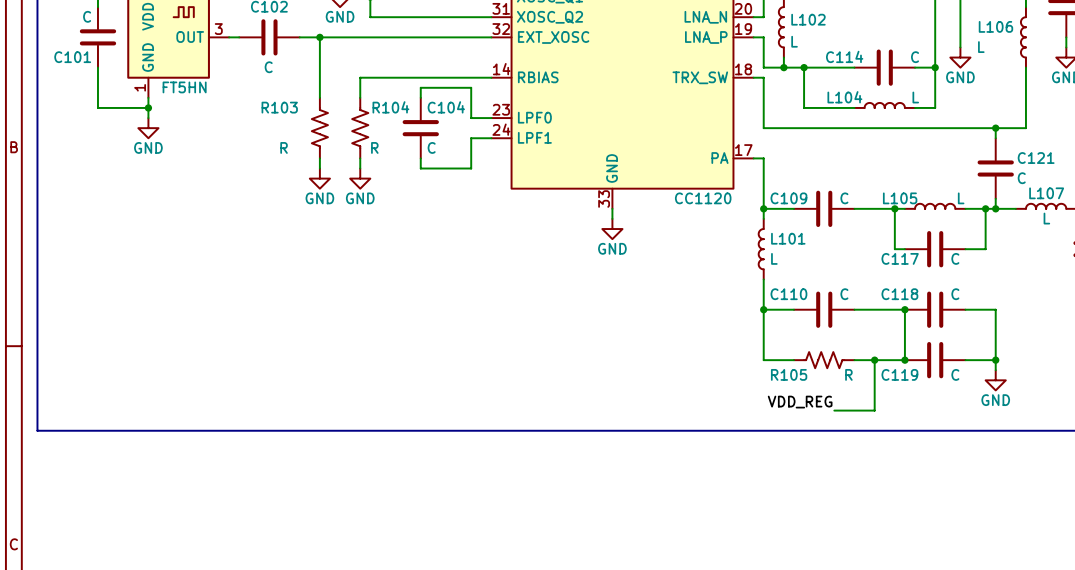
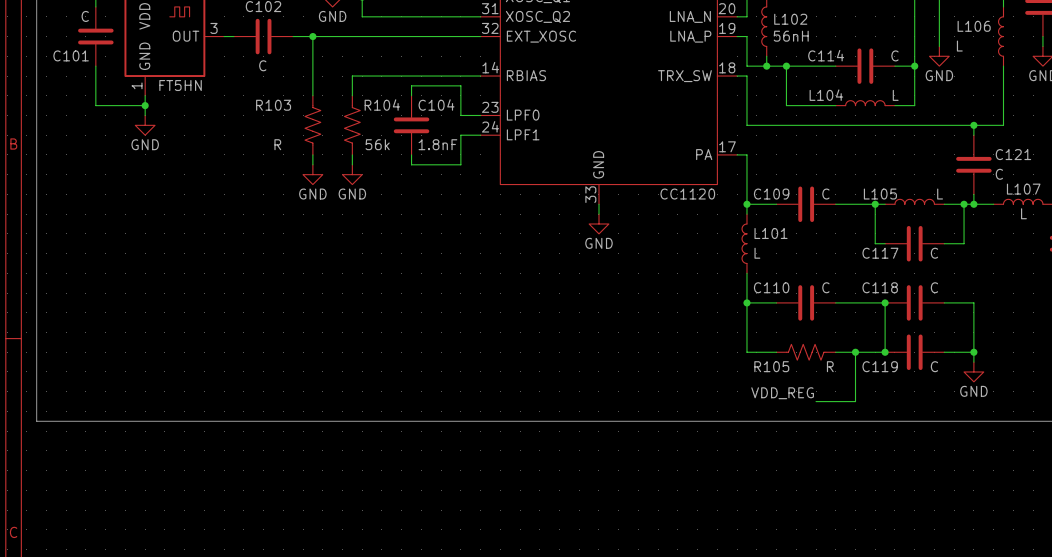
L102 value: L (794, 41) -> 56nH (791, 36)
R104 value: R (374, 147) -> 56k (377, 144)
C104 value: C (431, 147) -> 1.8nF (437, 144)

